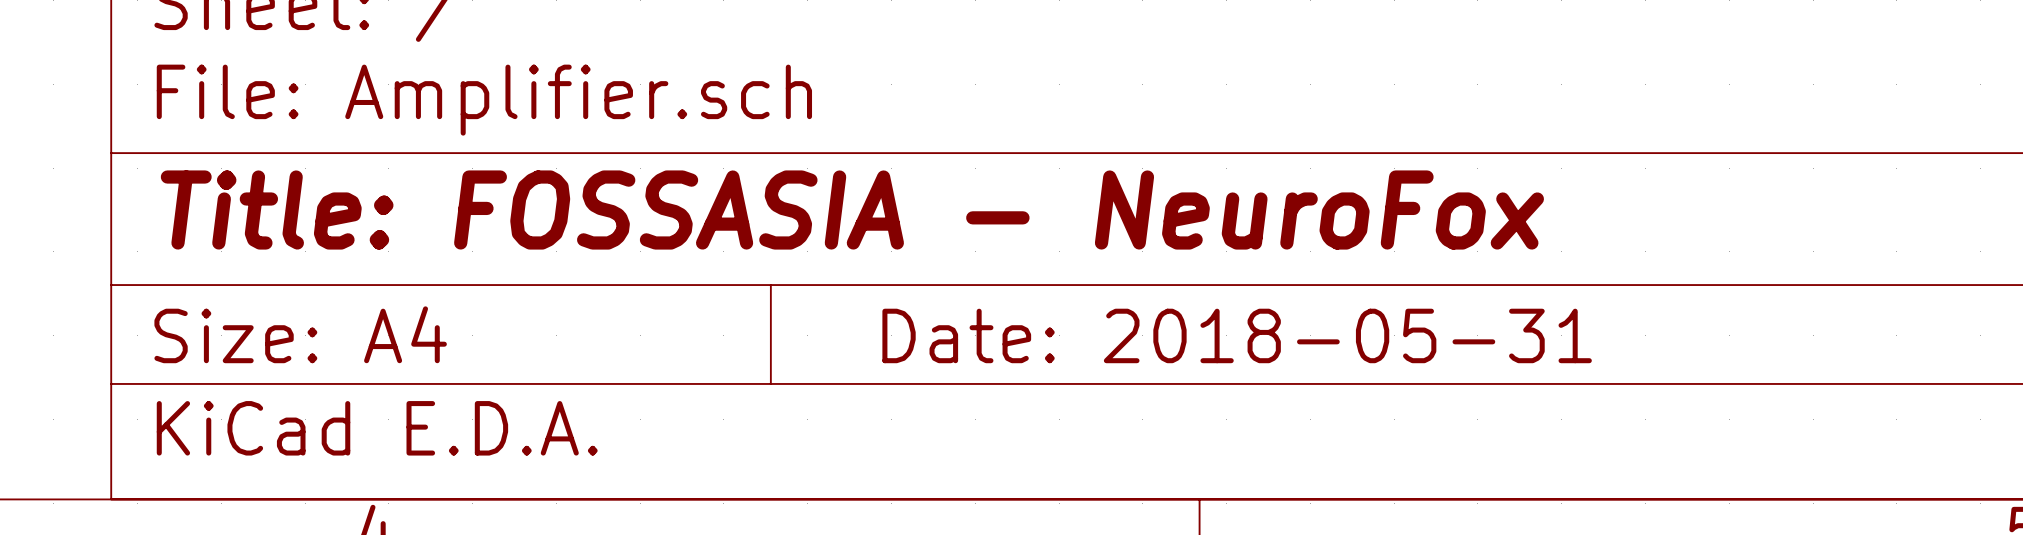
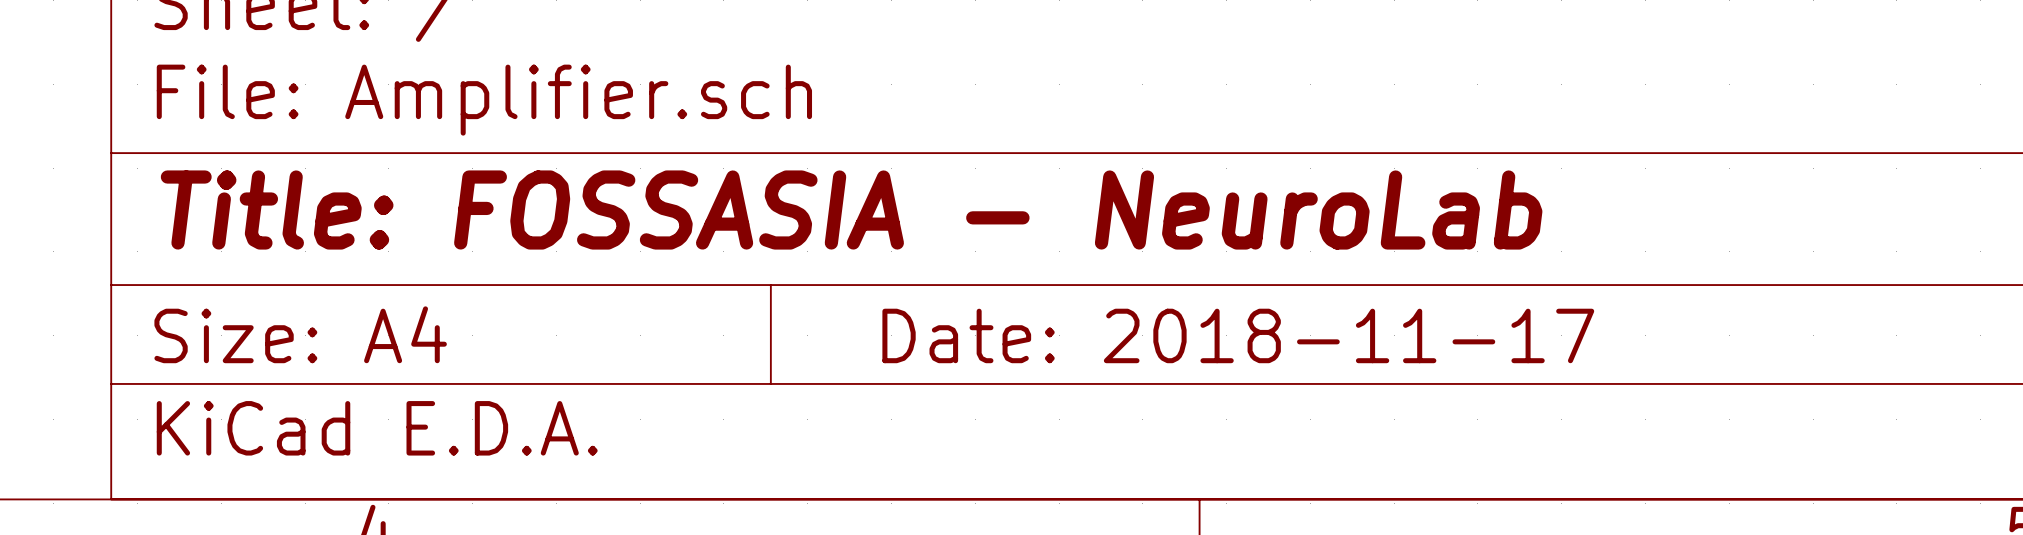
title block: Title: FOSSASIA - NeuroFox (852, 210) -> Title: FOSSASIA - NeuroLab (851, 210)
title block: Date: 2018-05-31 (1237, 335) -> Date: 2018-11-17 (1238, 335)

